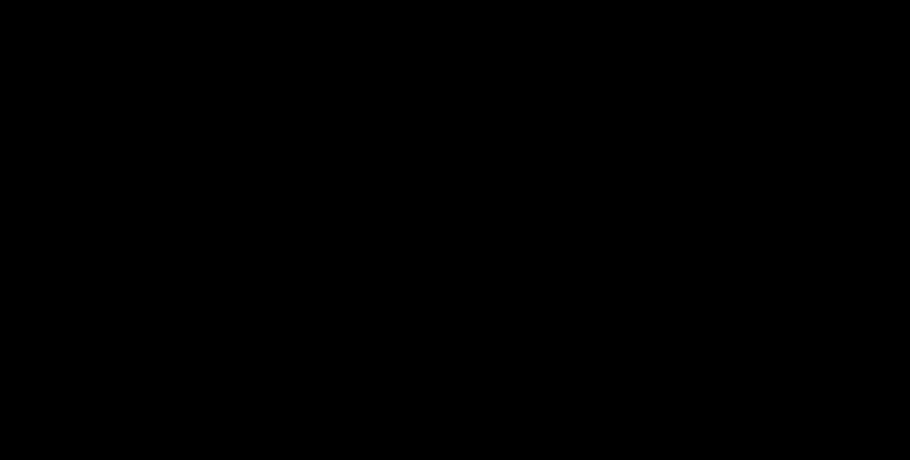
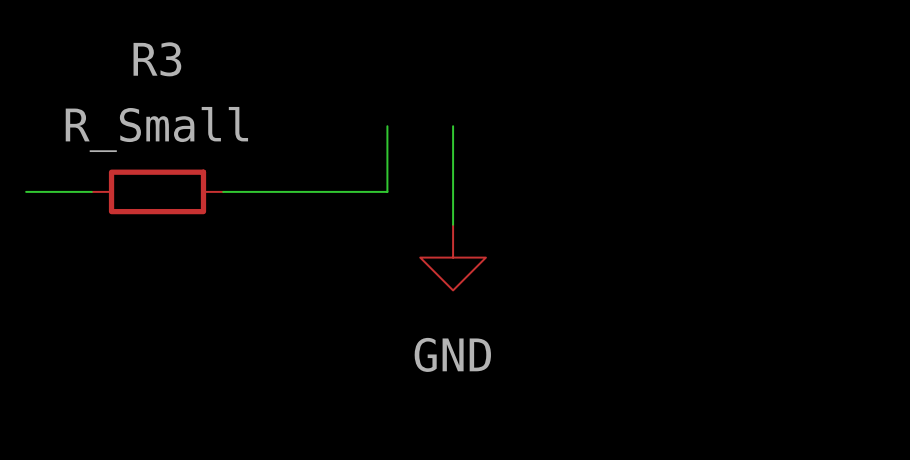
wire: none -> (387, 126) (387, 191) (223, 191)
wire: none -> (453, 126) (453, 224)
wire: none -> (26, 191) (91, 191)
R3: none -> R_Small (157, 191)
power symbol: none -> GND (453, 257)

